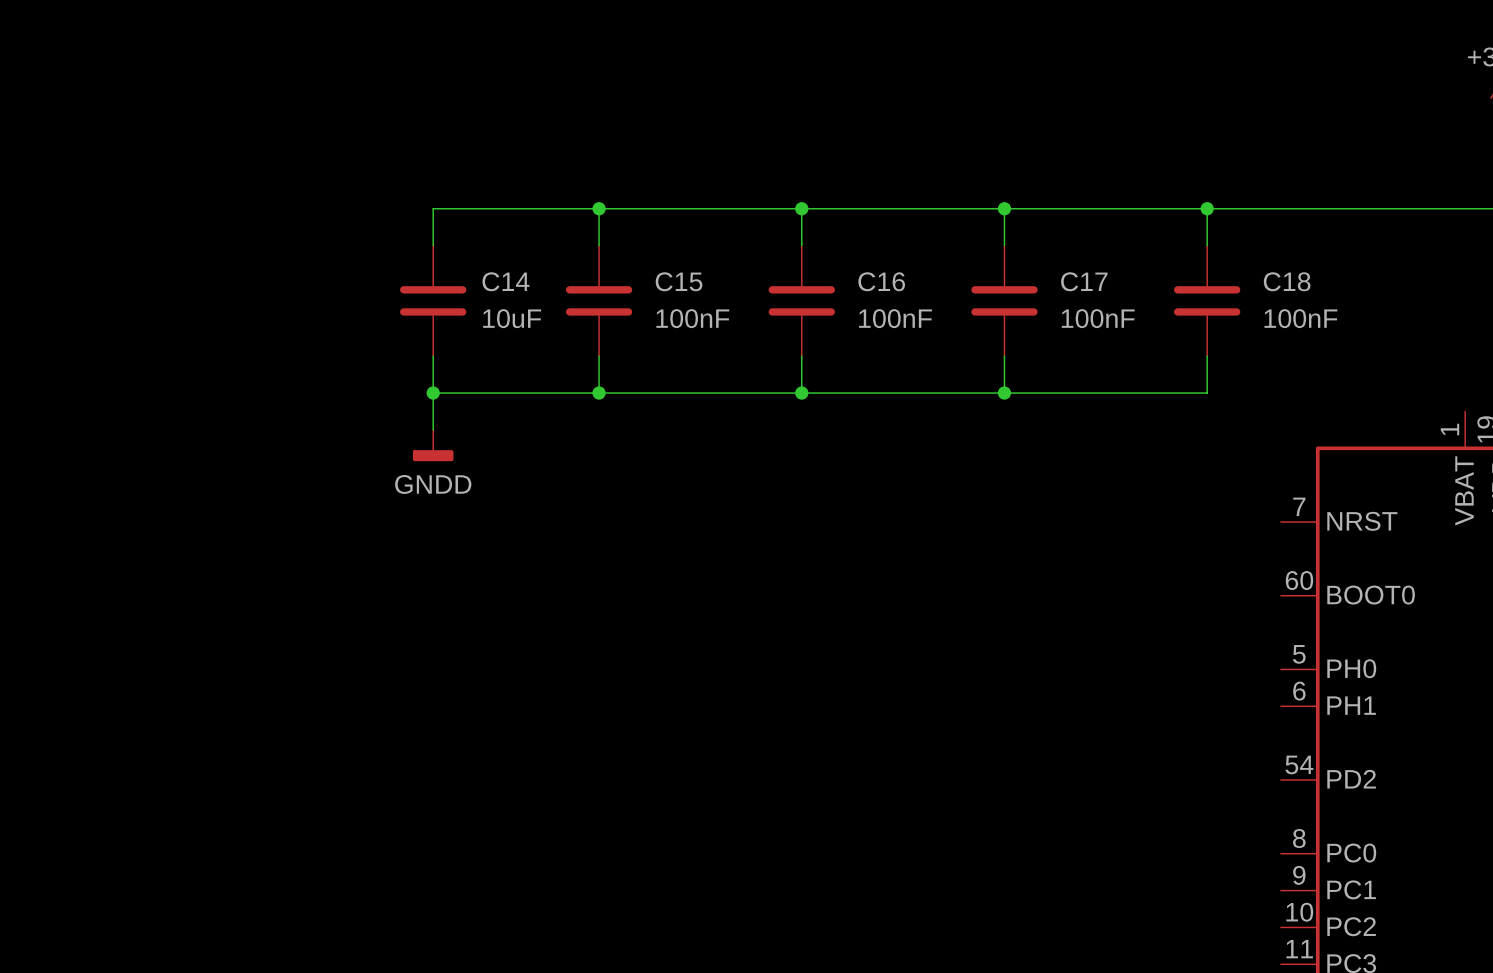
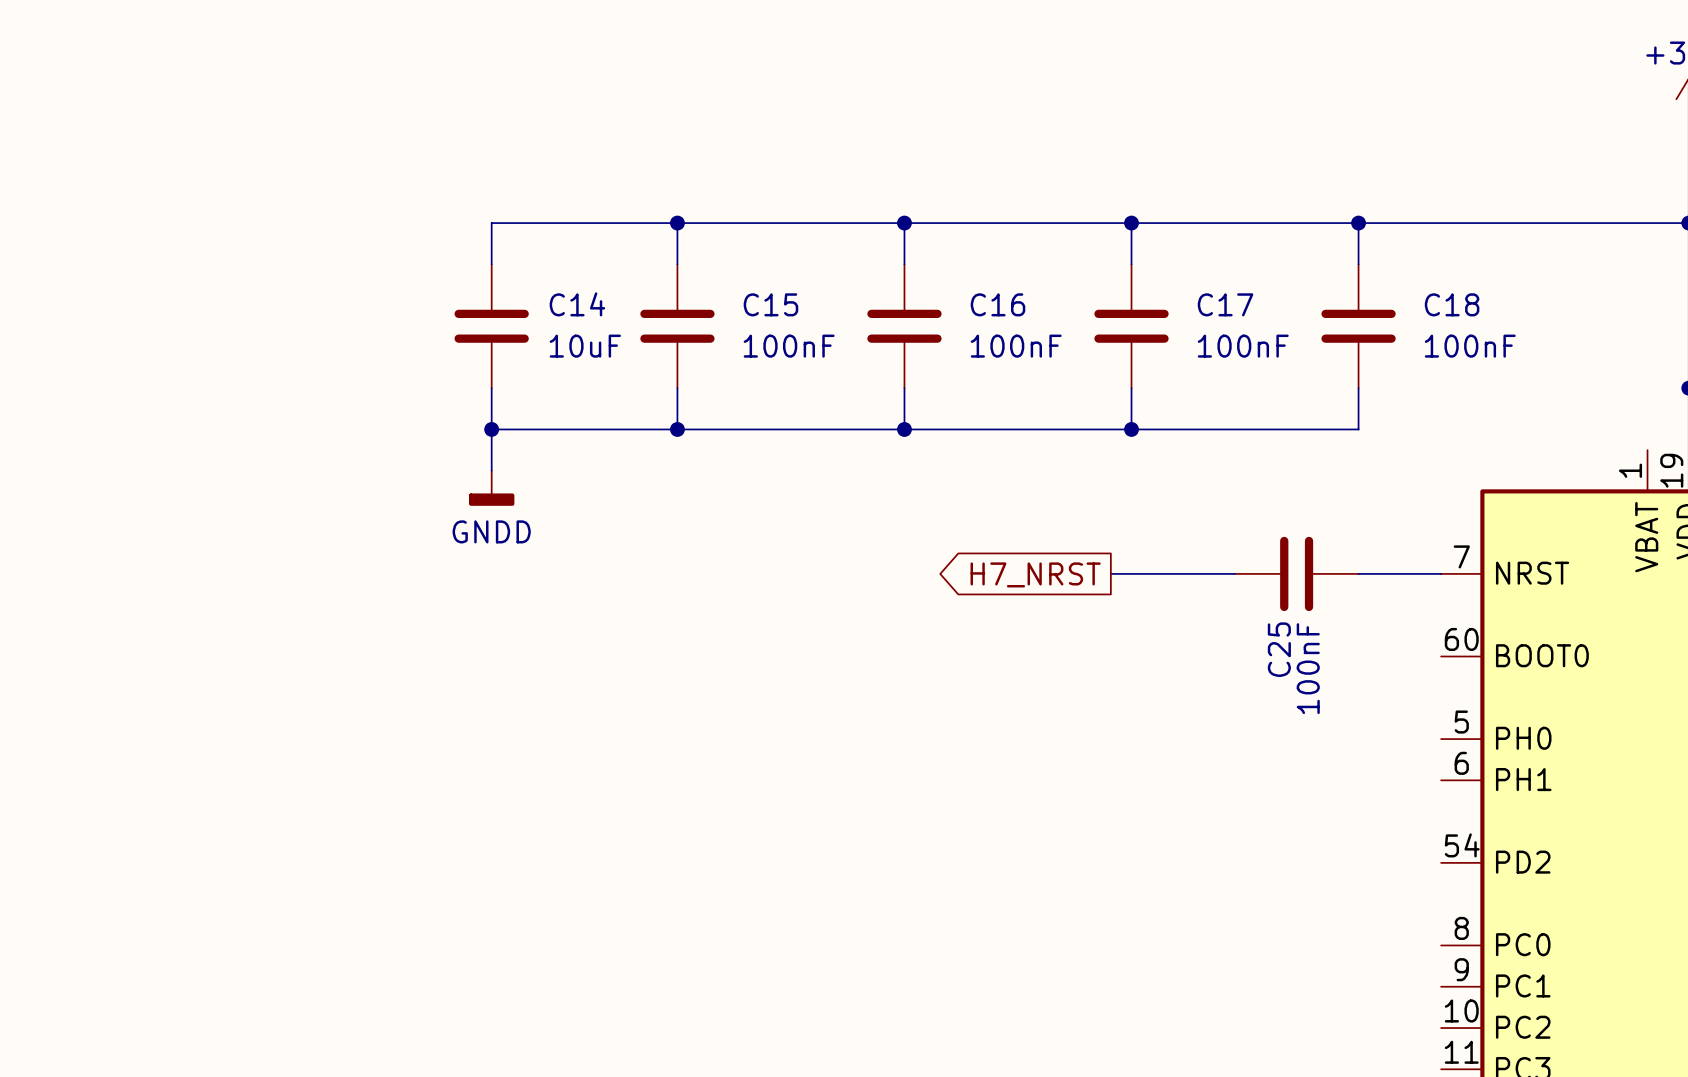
wire: none -> (1110, 573) (1234, 573)
C25: none -> 100nF (1296, 573)
wire: none -> (1358, 573) (1441, 573)
global label: none -> H7_NRST (1035, 574)

